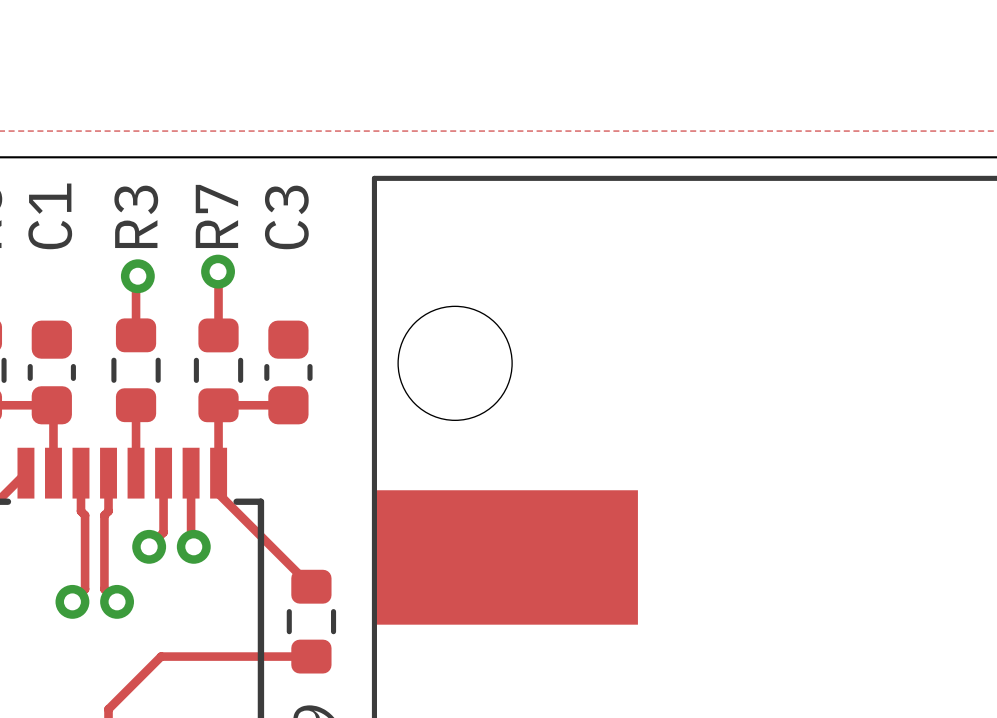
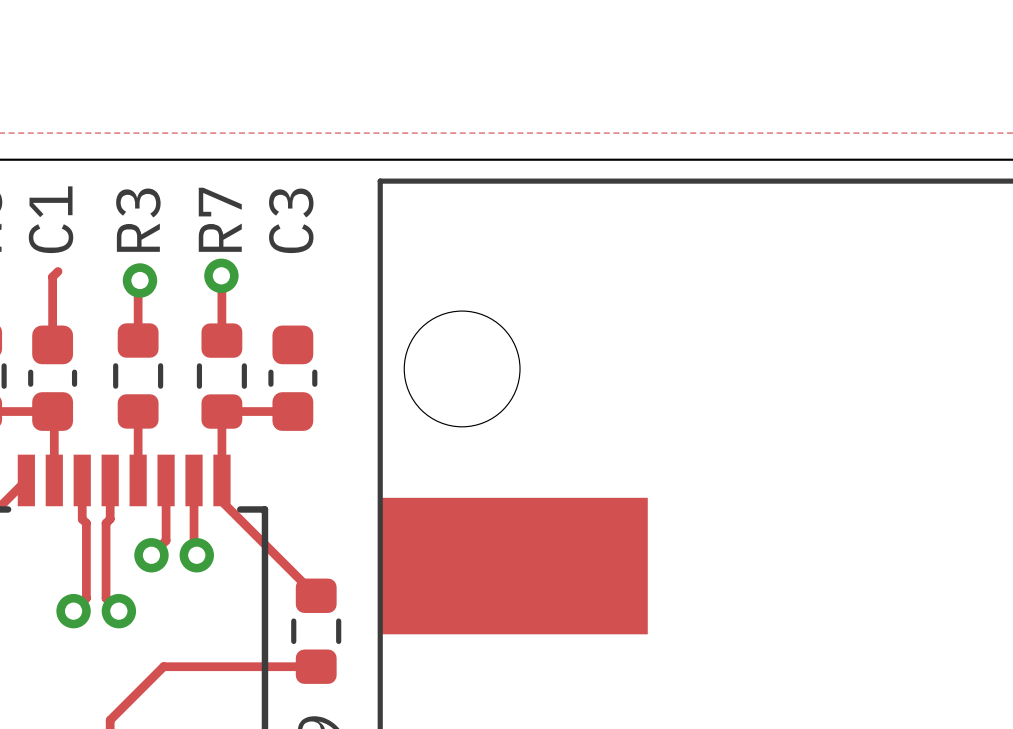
track: none -> (58, 271) (52, 276) (52, 344)

